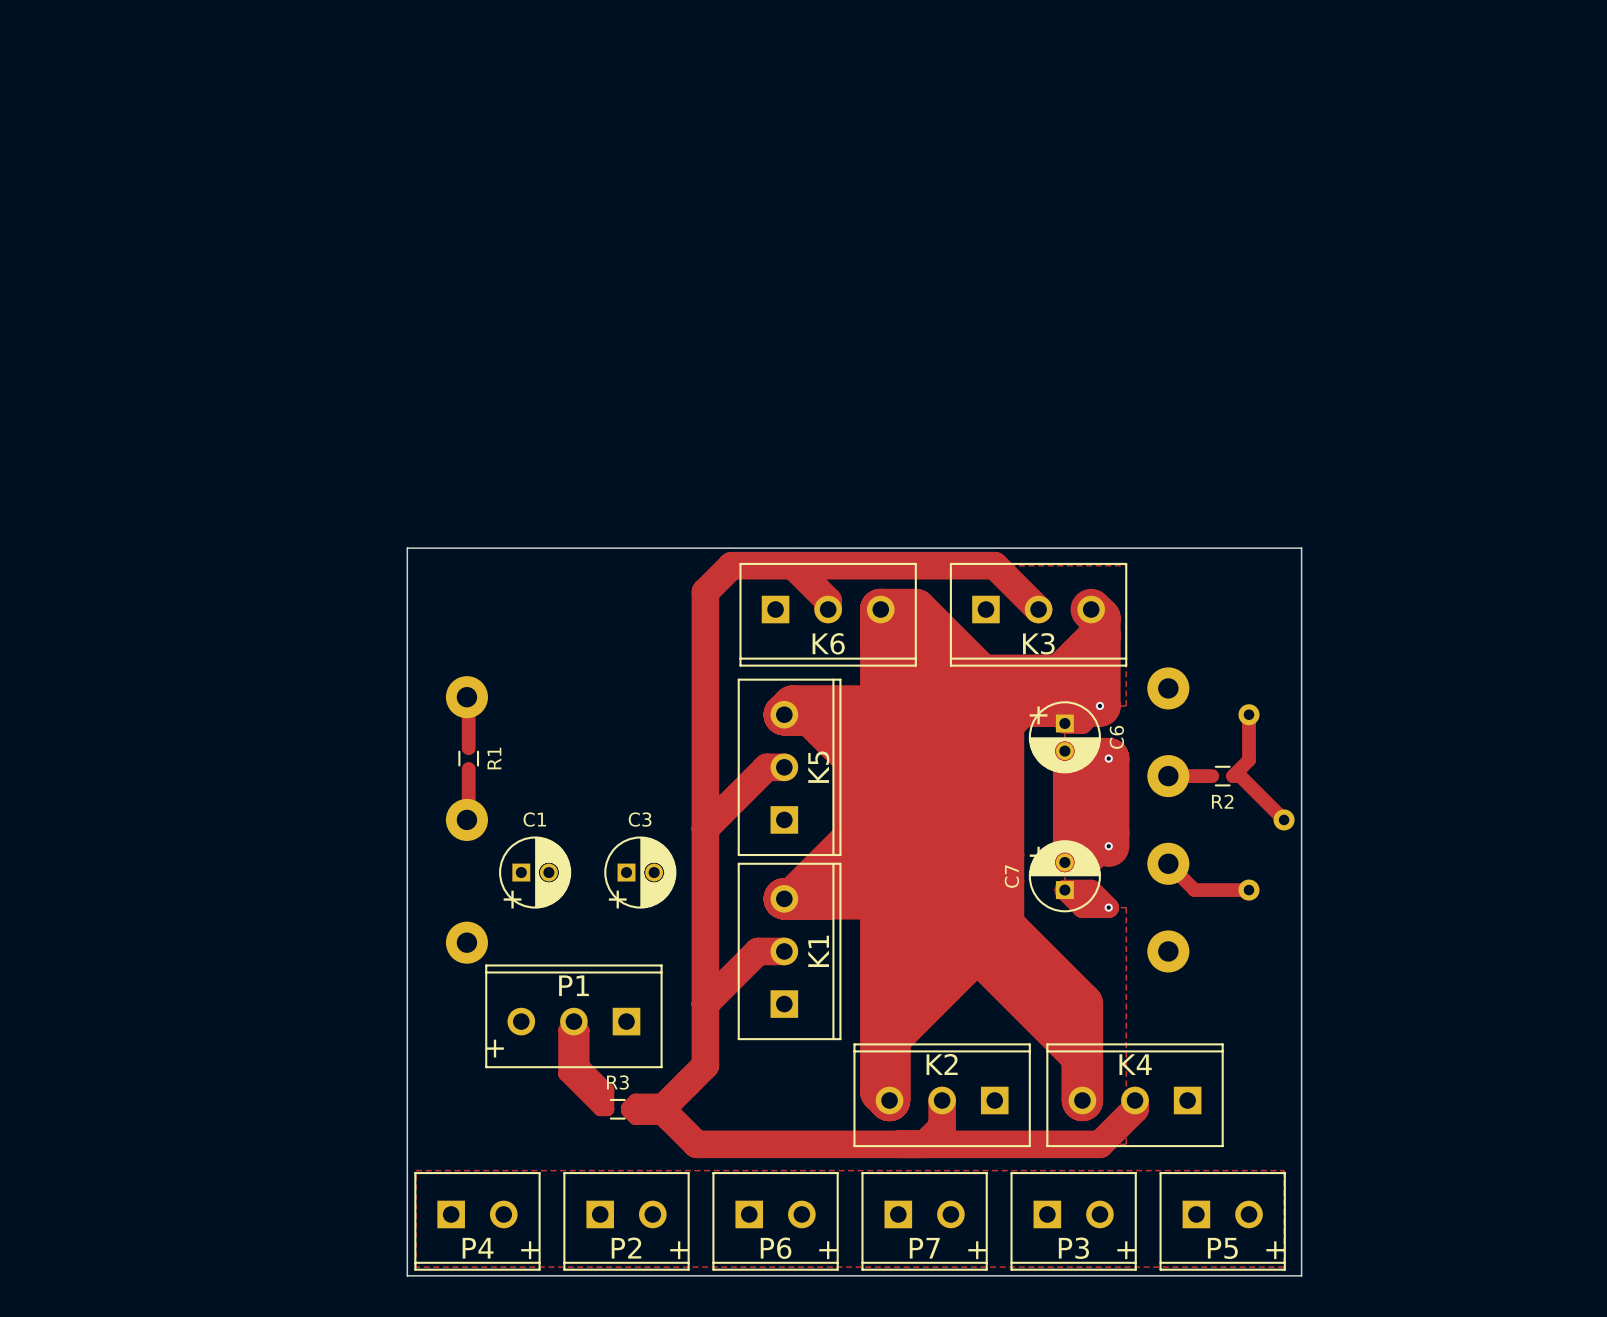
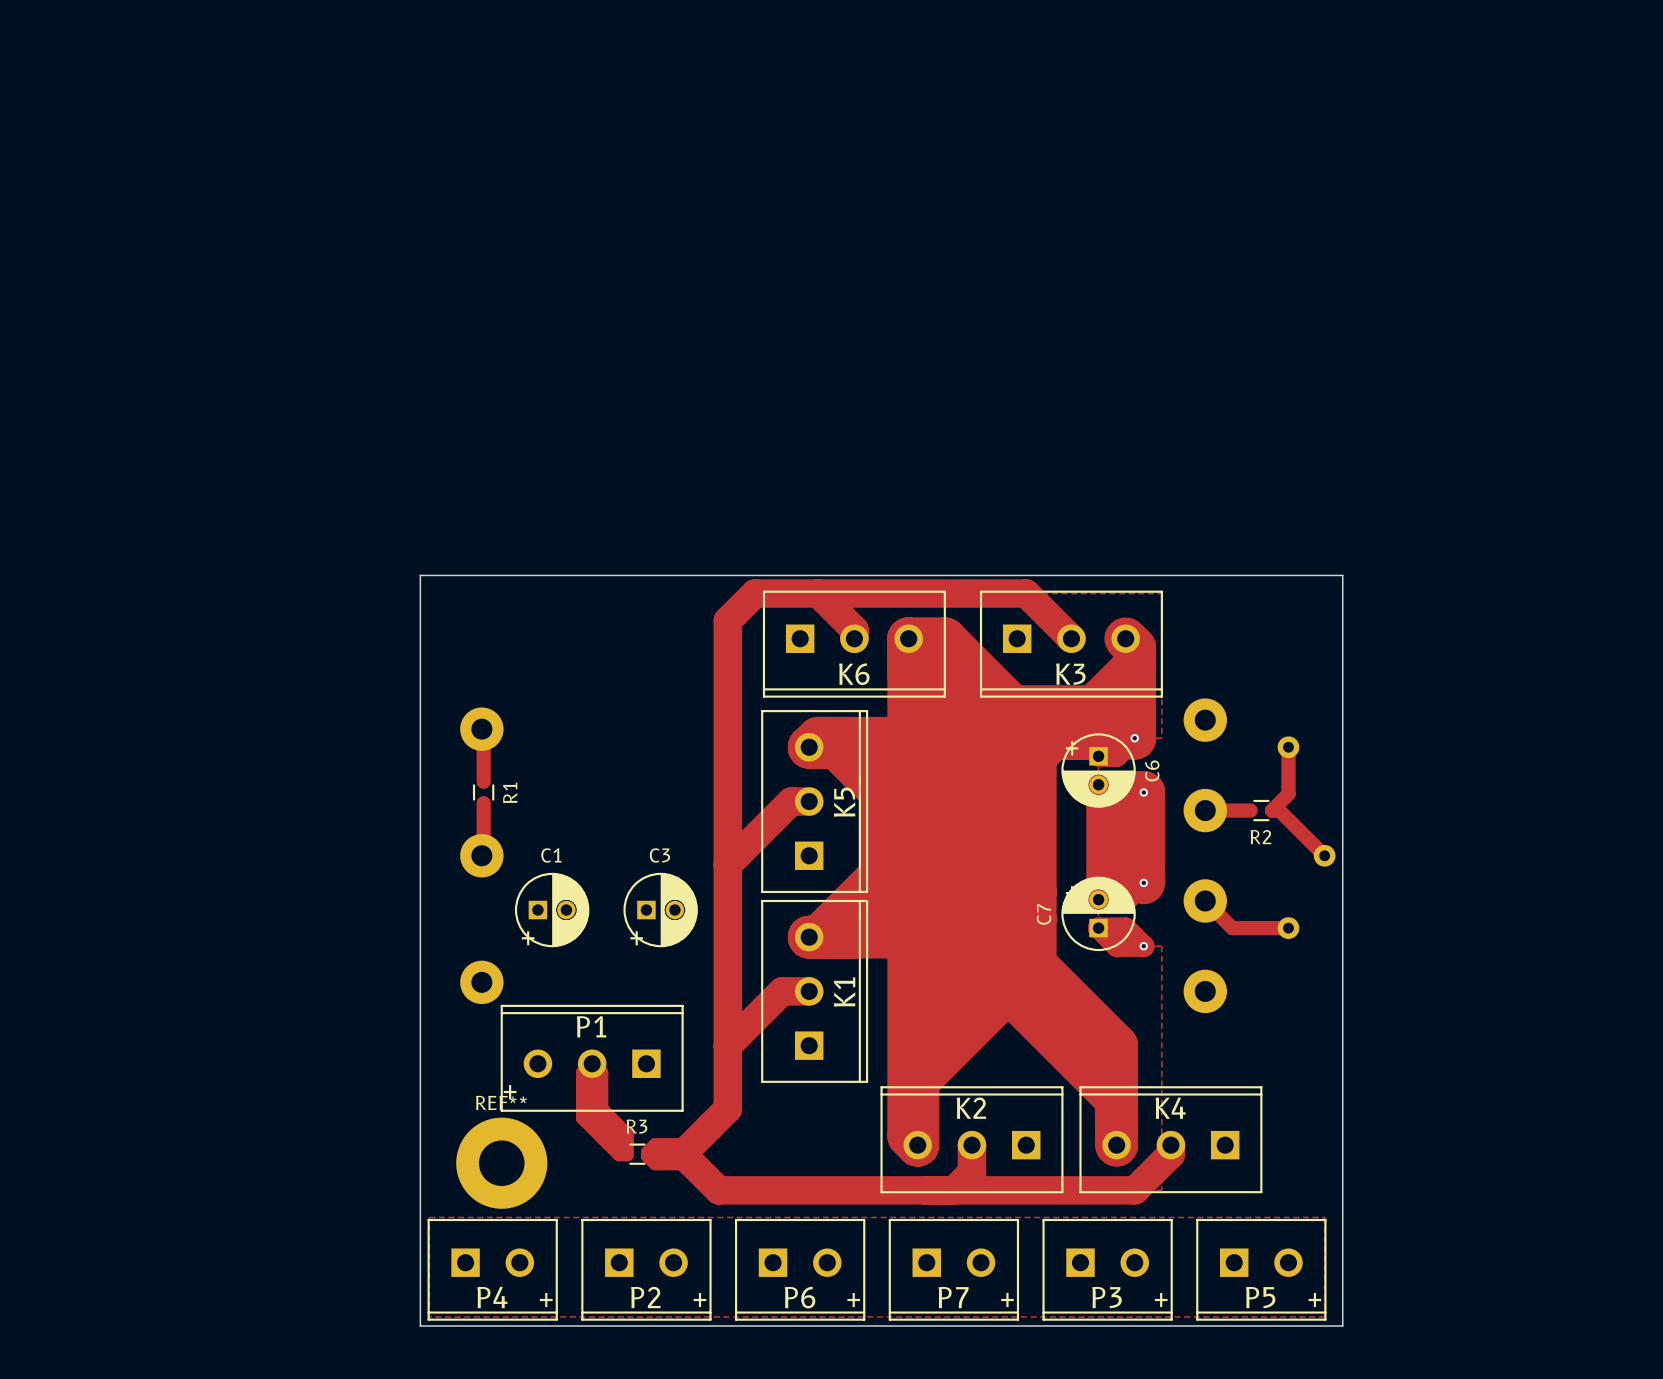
REF**: none -> (501, 1163)

